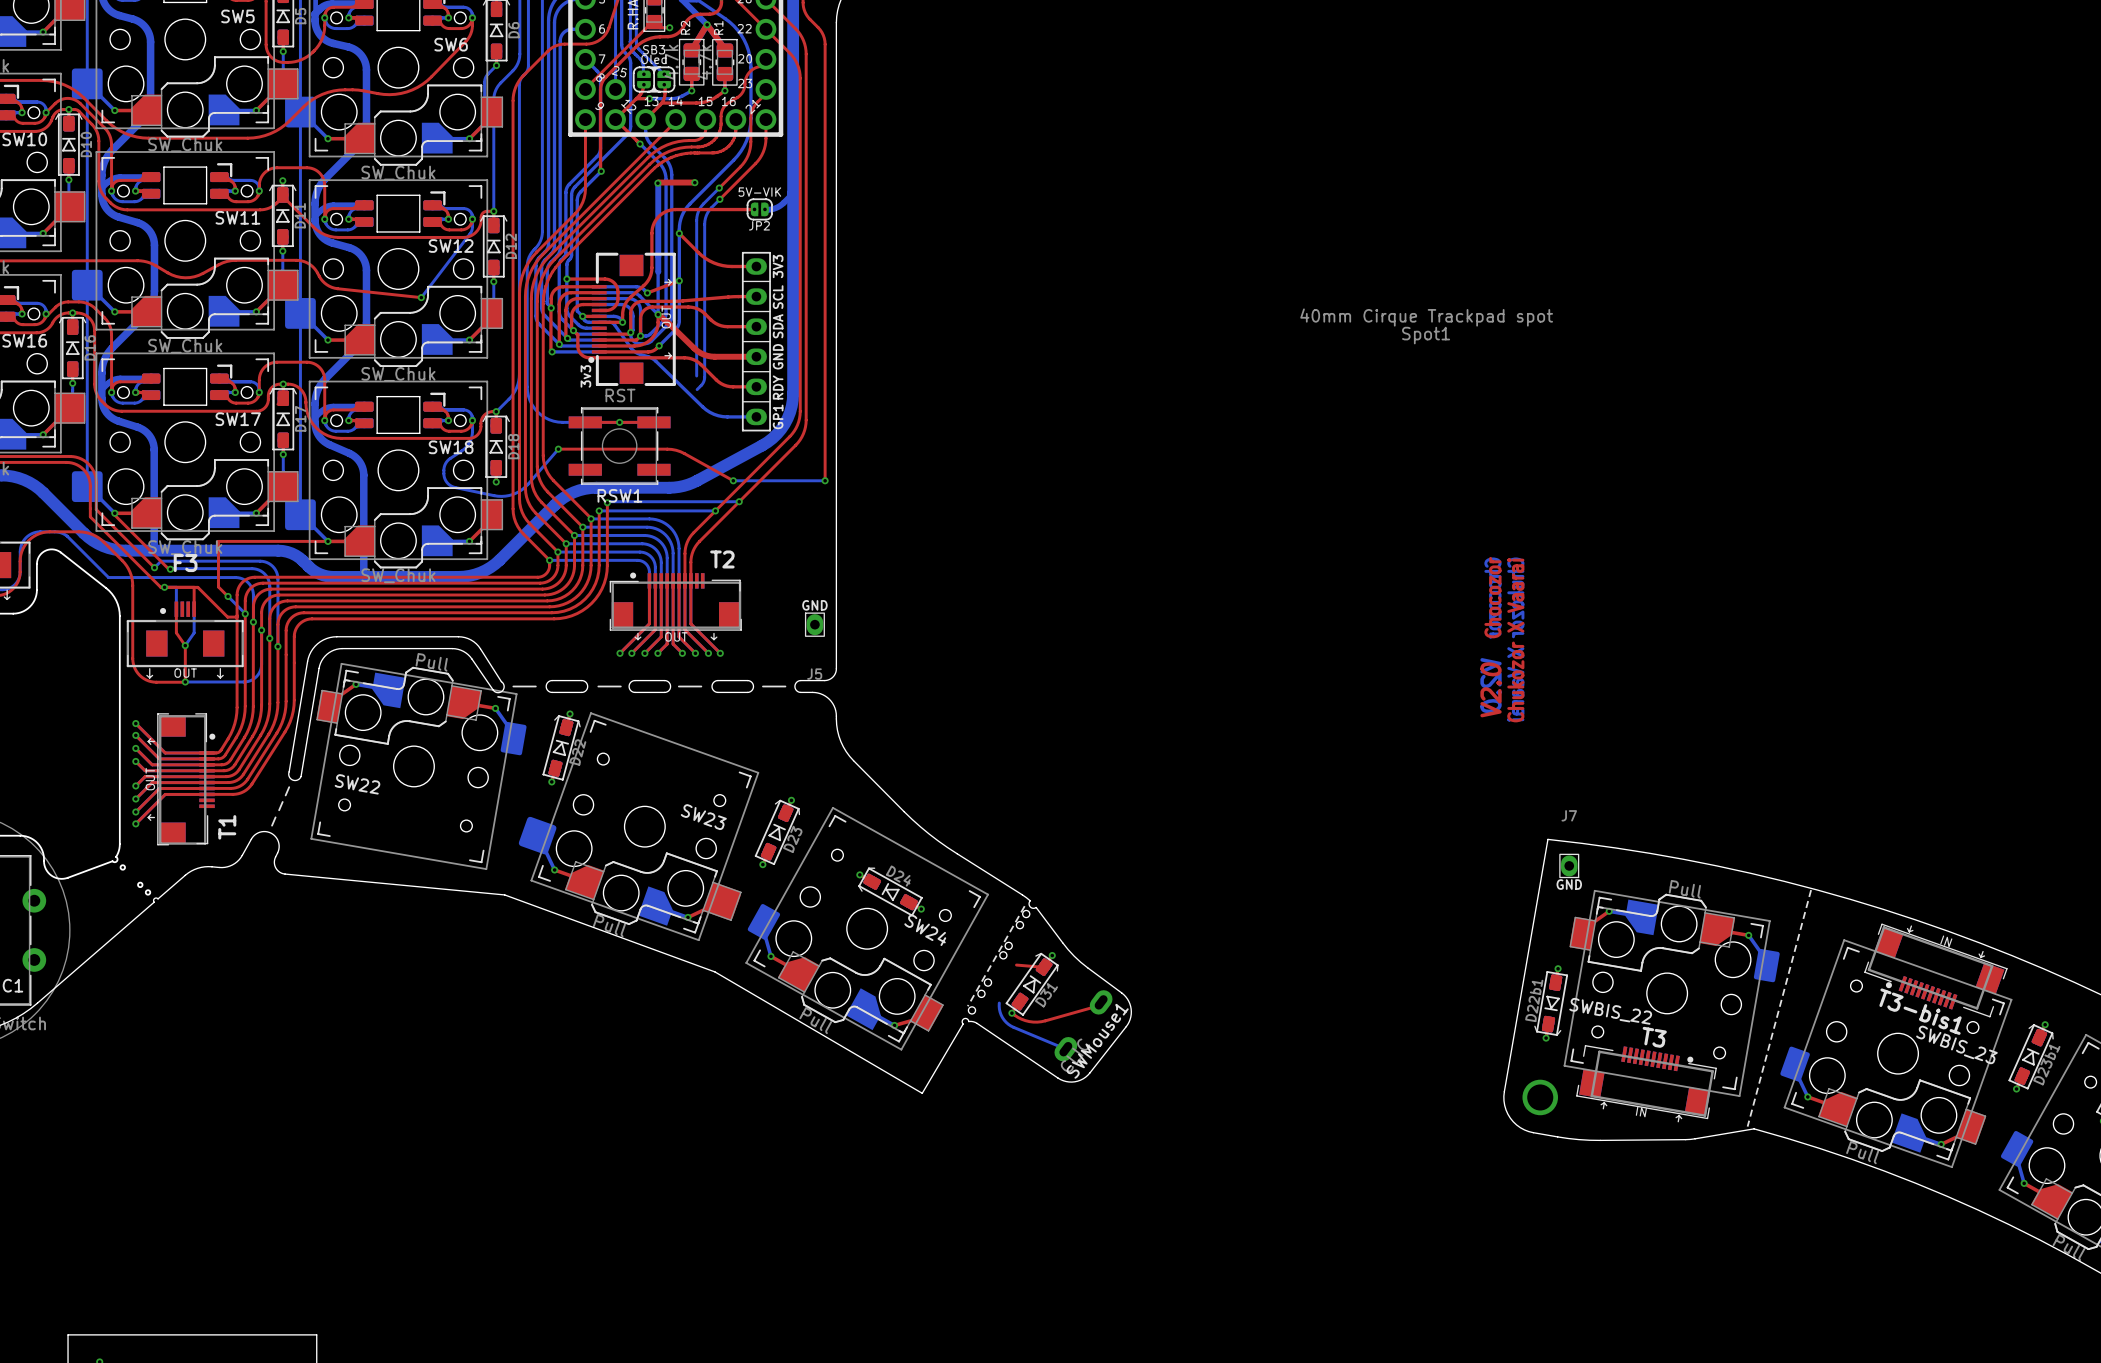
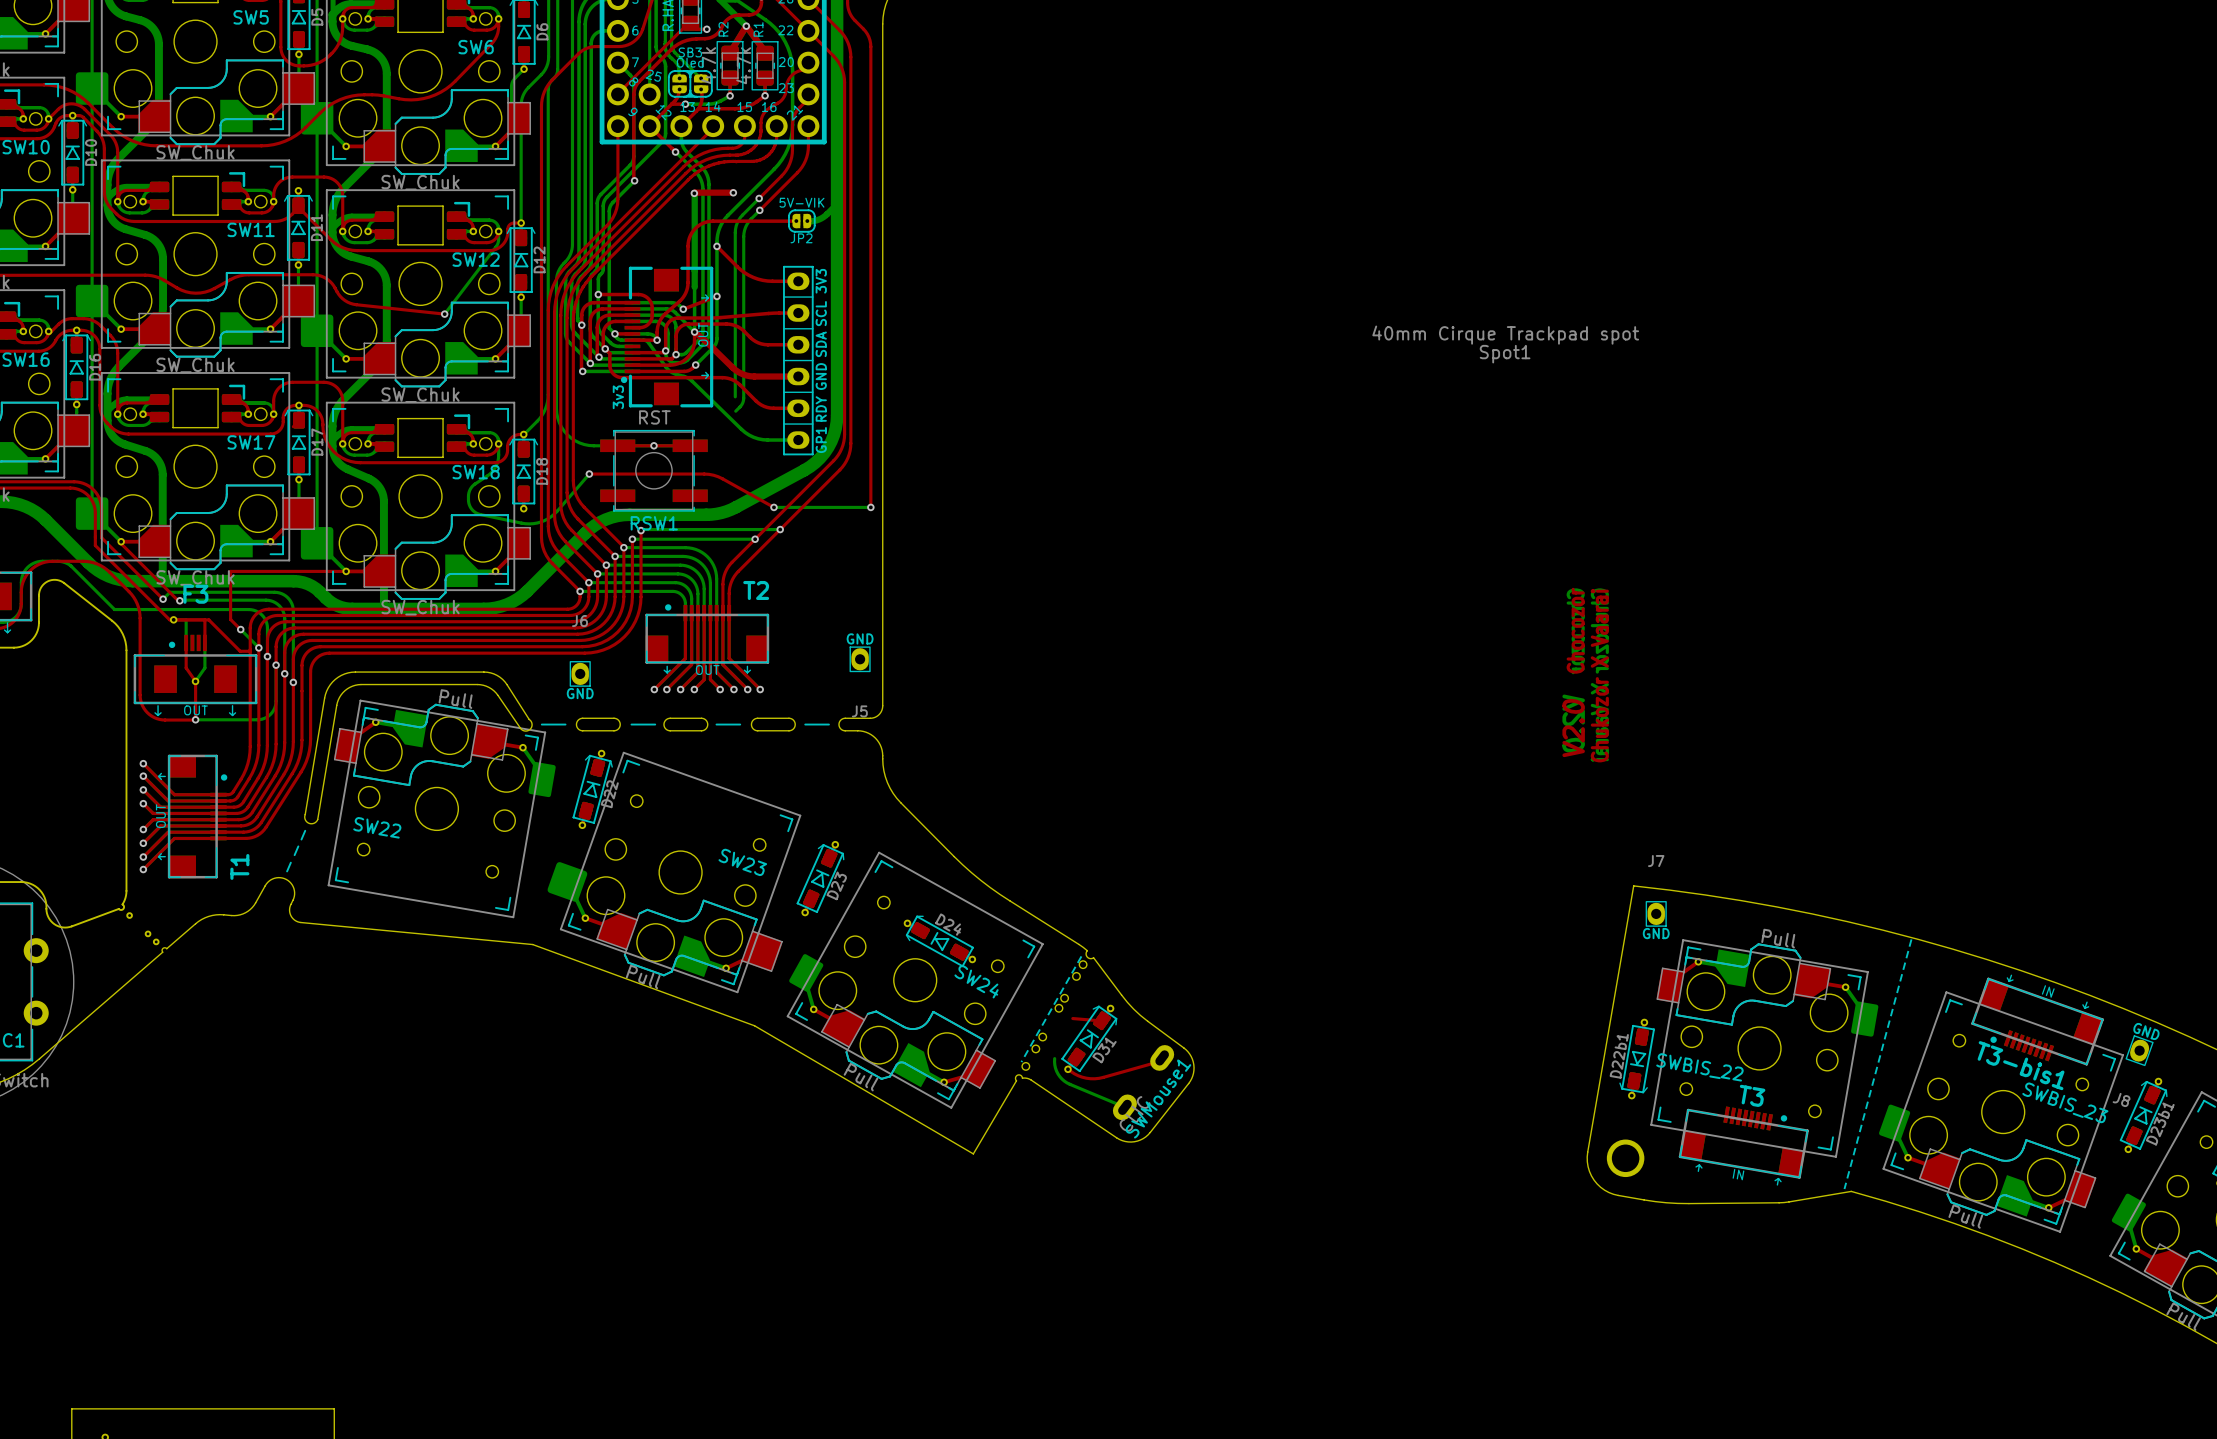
T2 footprint: [609, 572, 742, 641] -> [645, 604, 770, 674]
J6: none -> (580, 673)
T1 footprint: [147, 713, 216, 846] -> [158, 754, 228, 879]
T3-bis1 footprint: [1864, 923, 2008, 1018] -> [1971, 974, 2104, 1066]
J8: none -> (2139, 1050)
T3 footprint: [1576, 1045, 1717, 1123] -> [1678, 1106, 1809, 1186]

